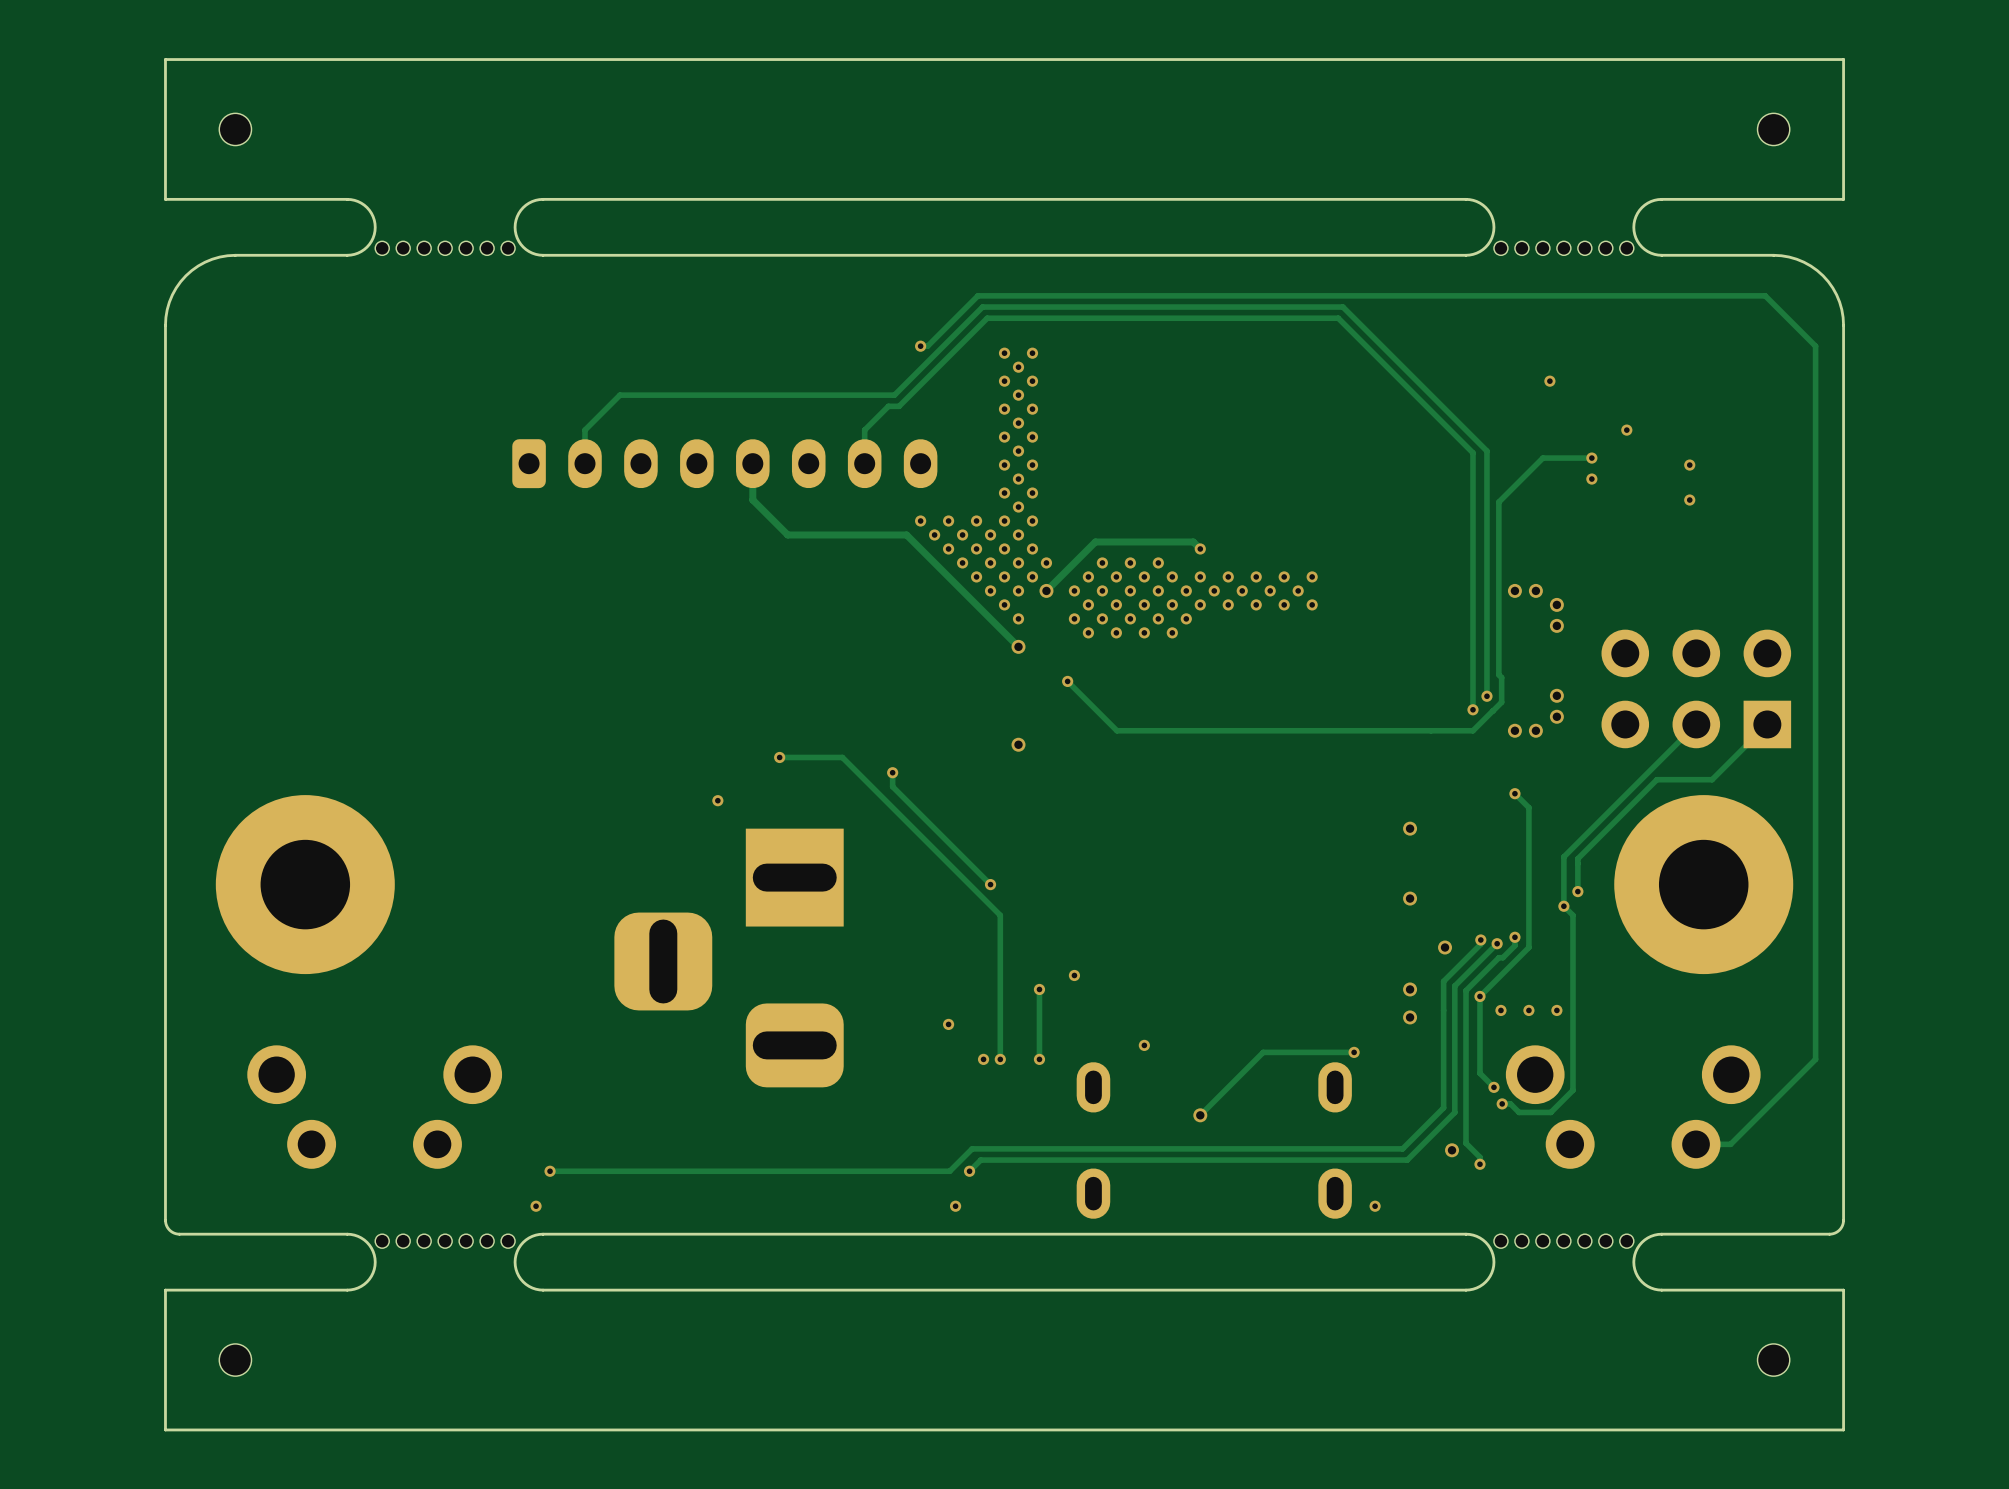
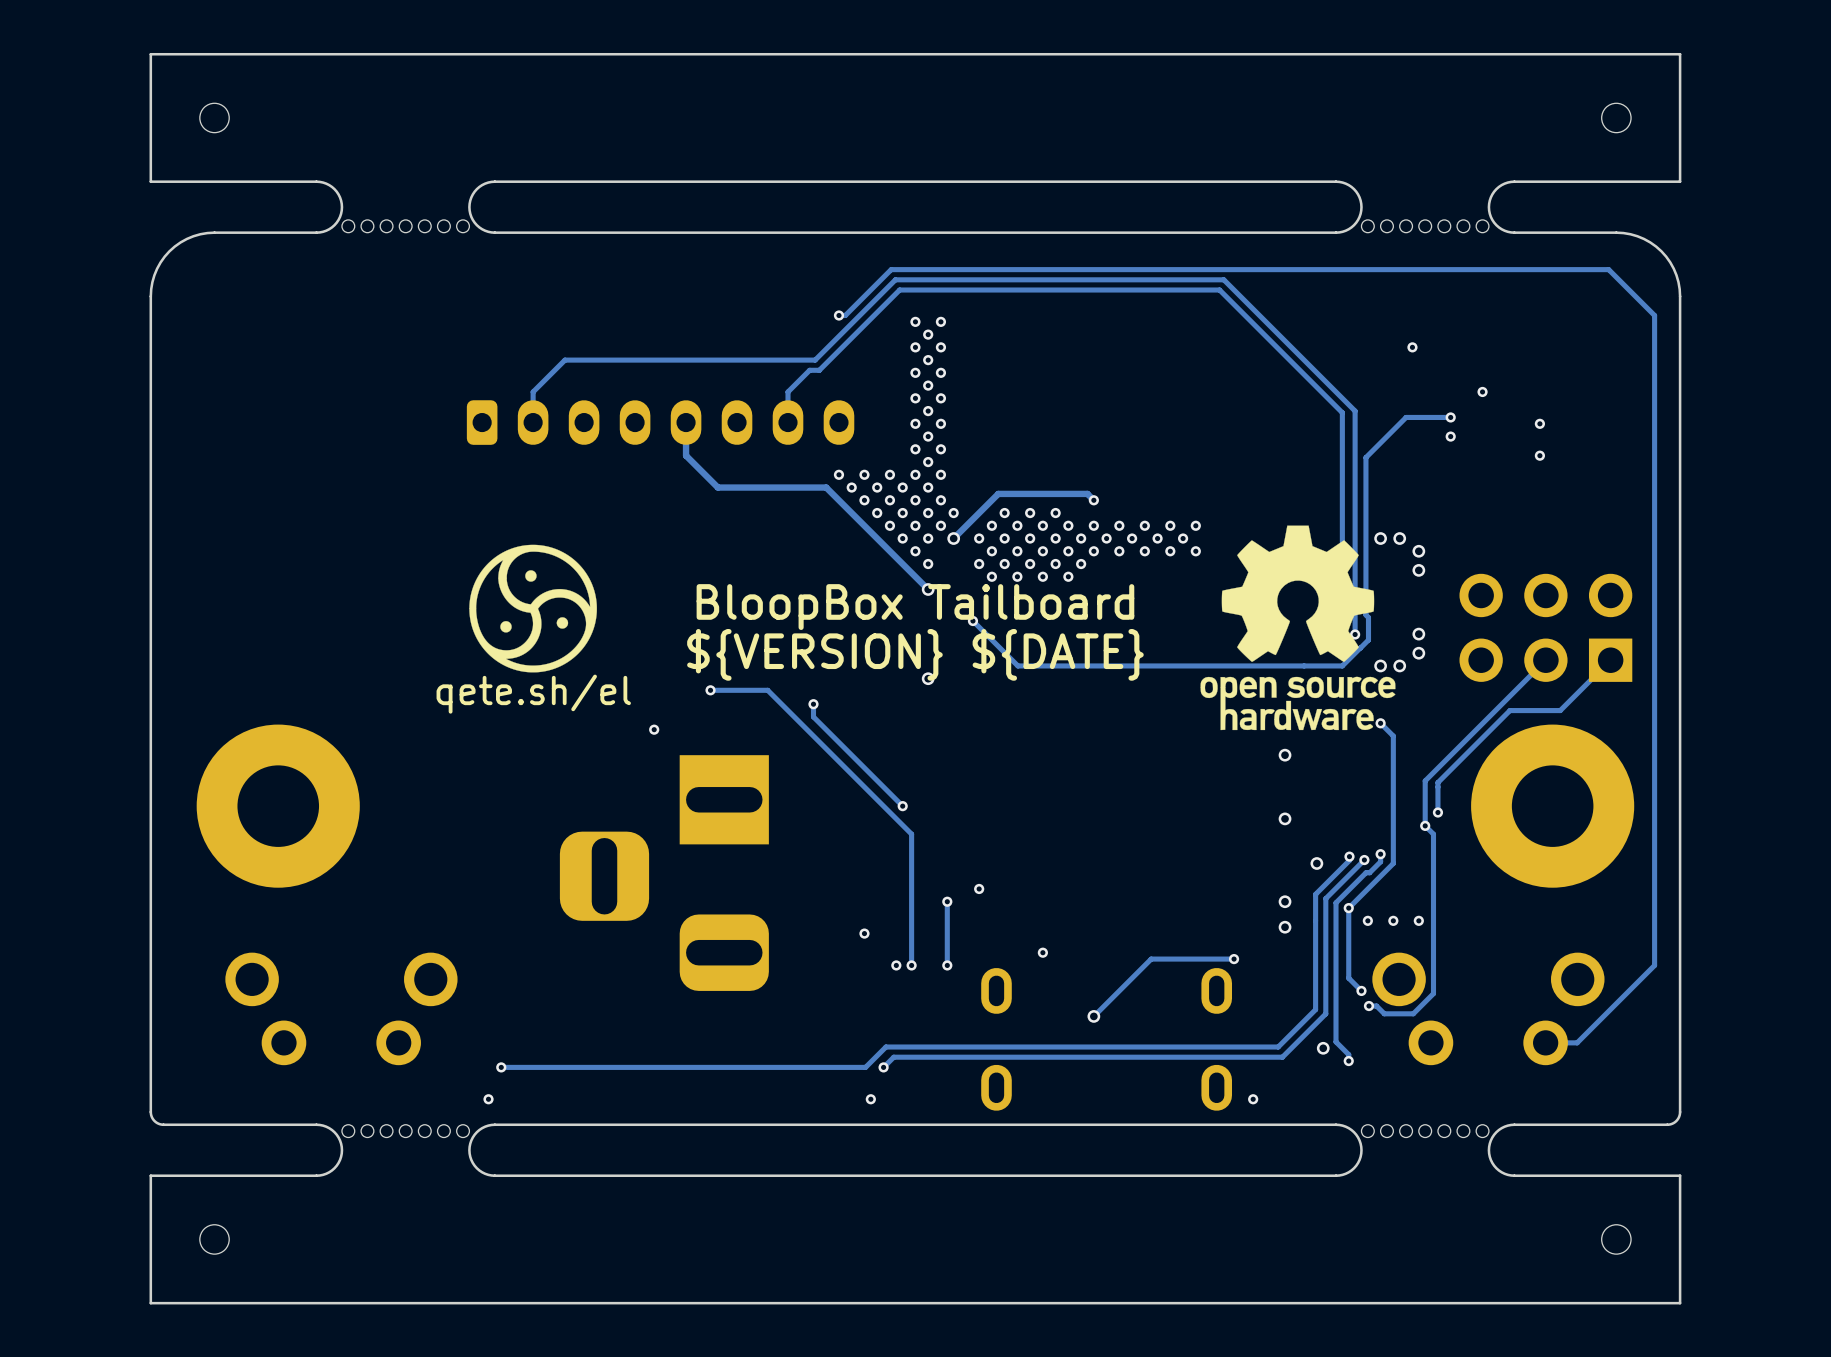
drawing: none -> [1200, 525, 1396, 731]
drawing: none -> [469, 544, 597, 673]
text: none -> BloopBox Tailboard (915, 607)
text: none -> ${VERSION} ${DATE} (915, 654)
text: none -> qete.sh/el (533, 694)

